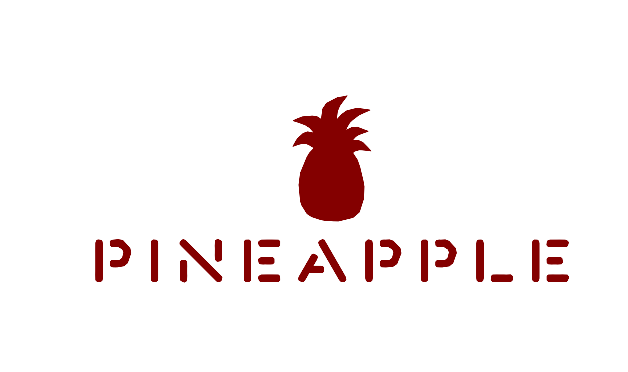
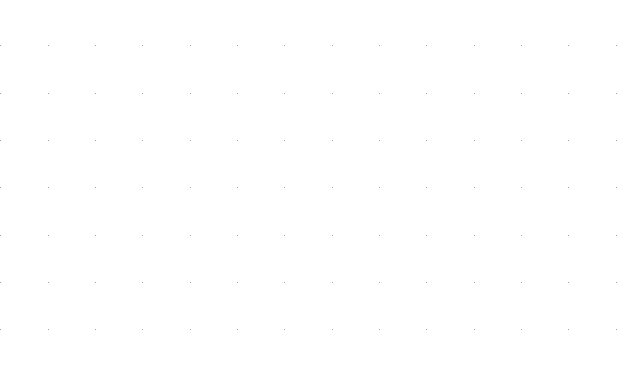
part: (332, 188) -> none

